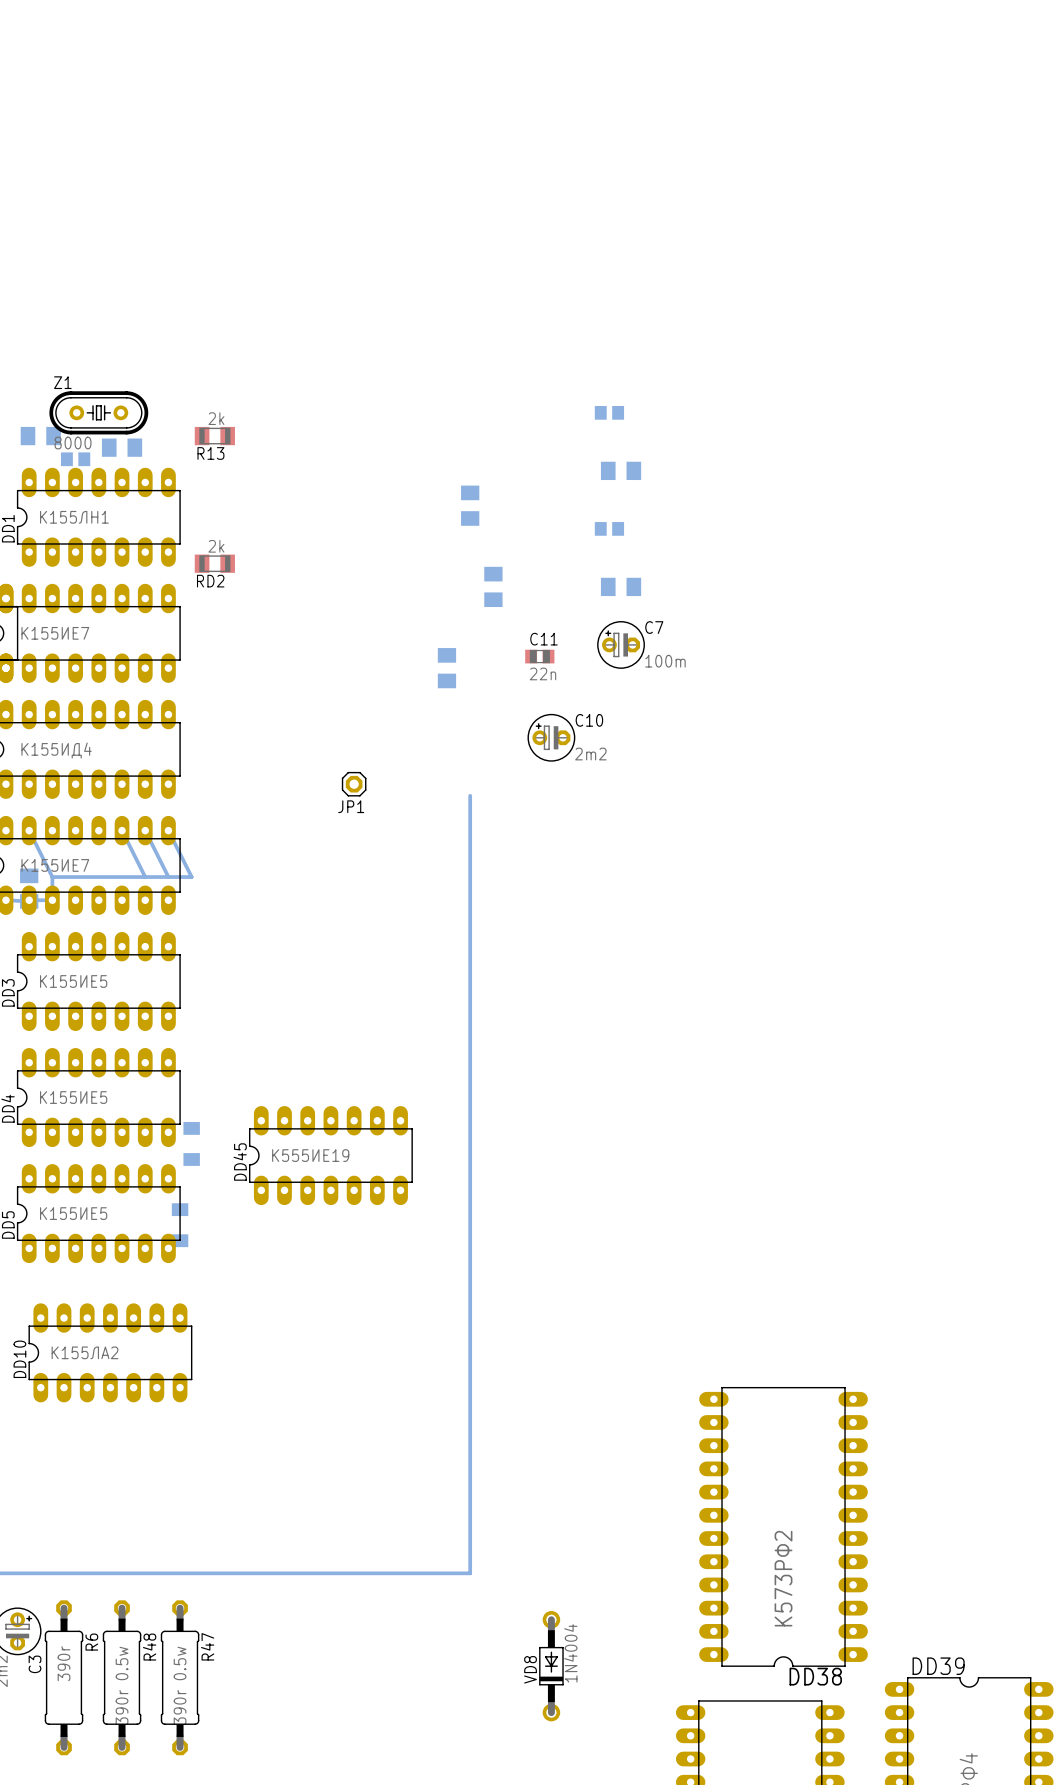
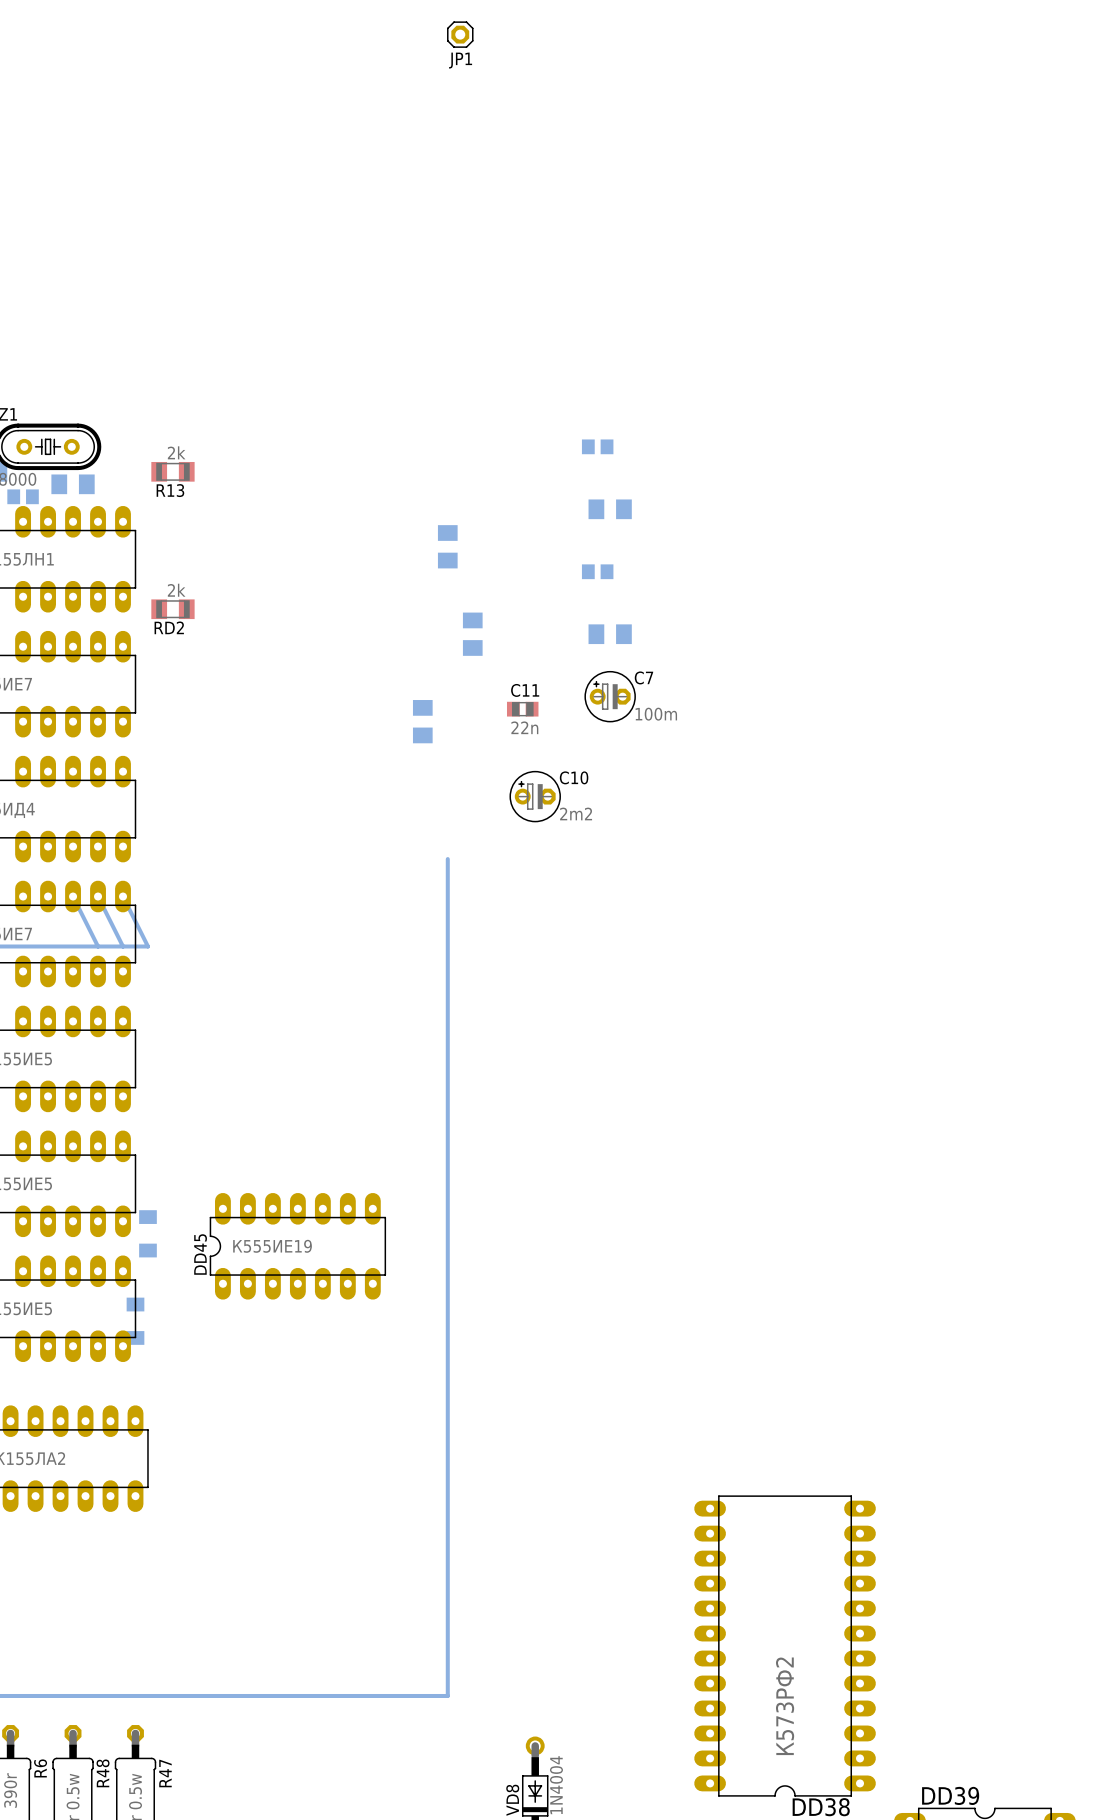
JP1 position: (354, 784) -> (460, 34)

